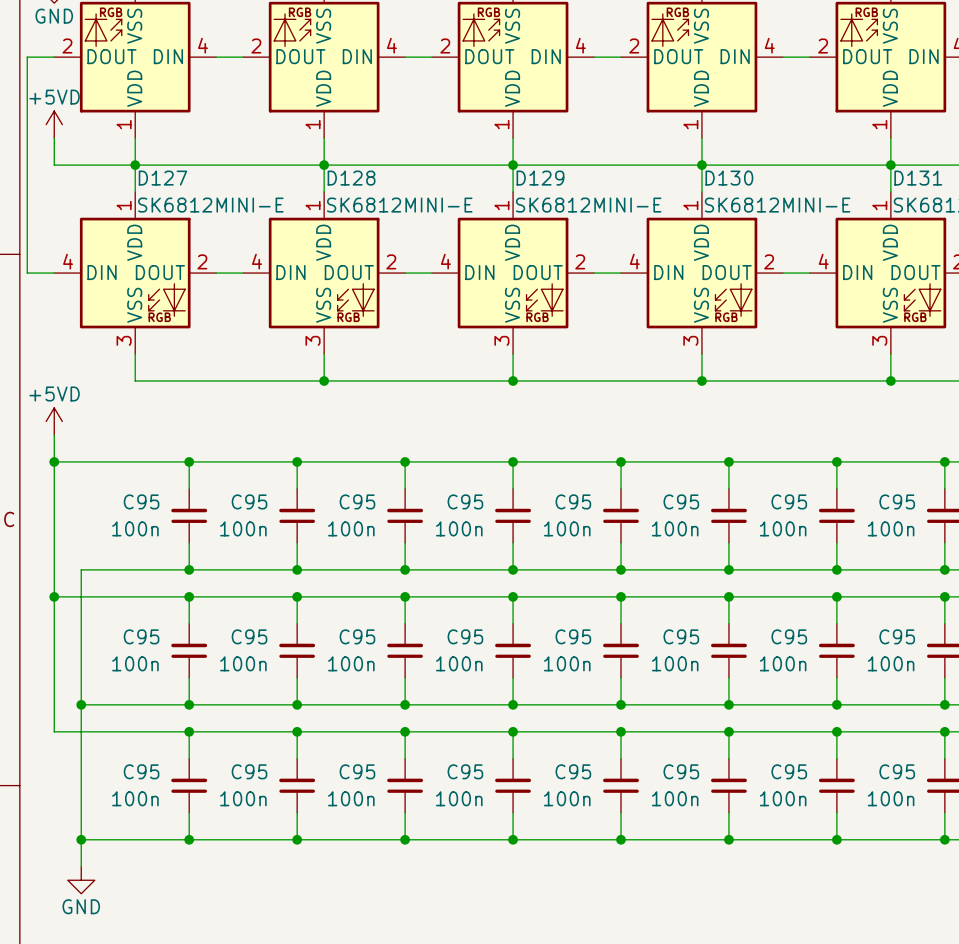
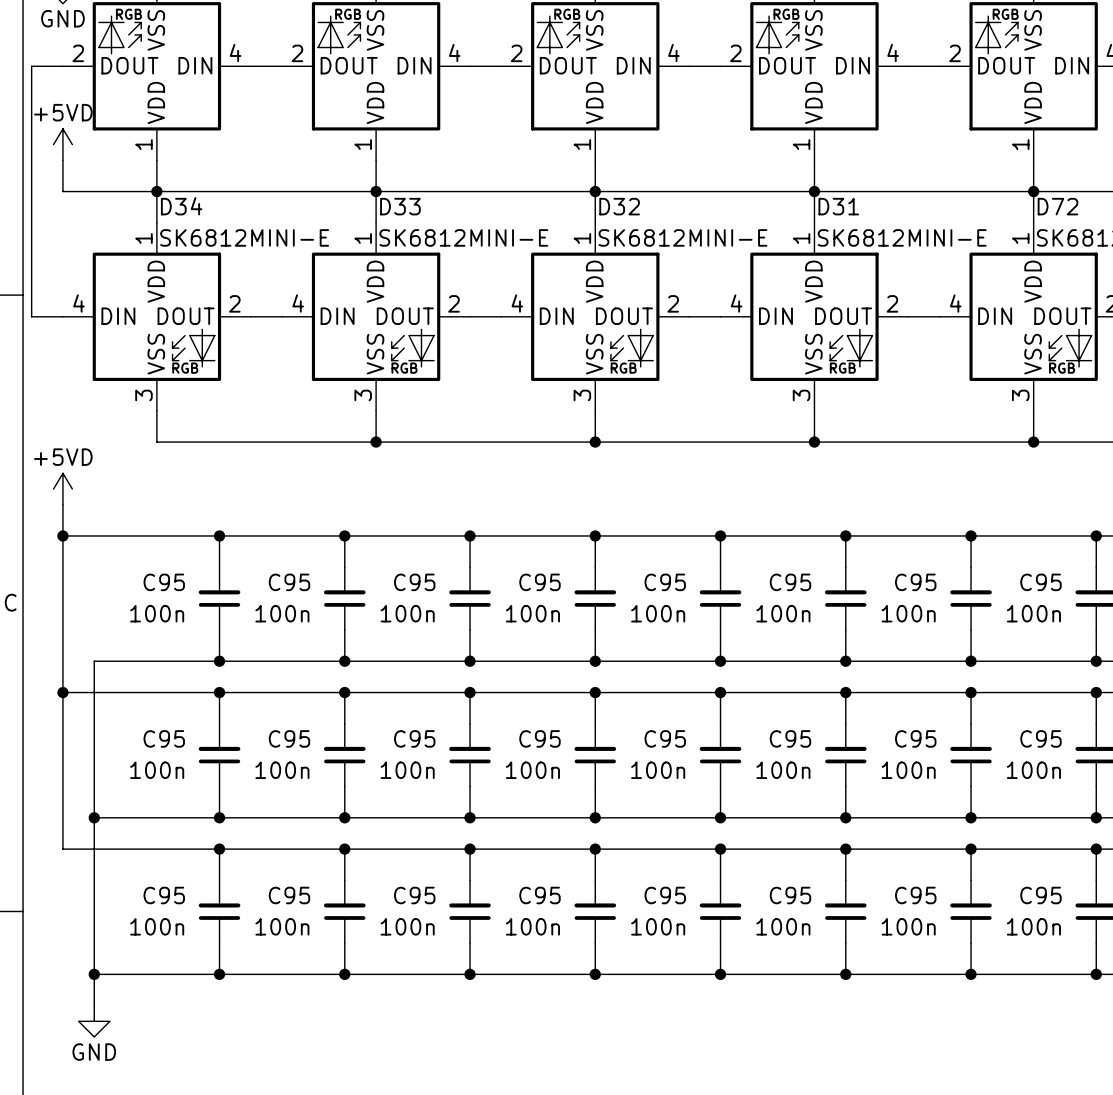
D127 name: D127 (162, 178) -> D34 (181, 206)
D128 name: D128 (351, 178) -> D33 (400, 206)
D129 name: D129 (540, 178) -> D32 (619, 206)
D130 name: D130 (729, 178) -> D31 (838, 206)
D131 name: D131 (918, 178) -> D72 (1058, 206)

